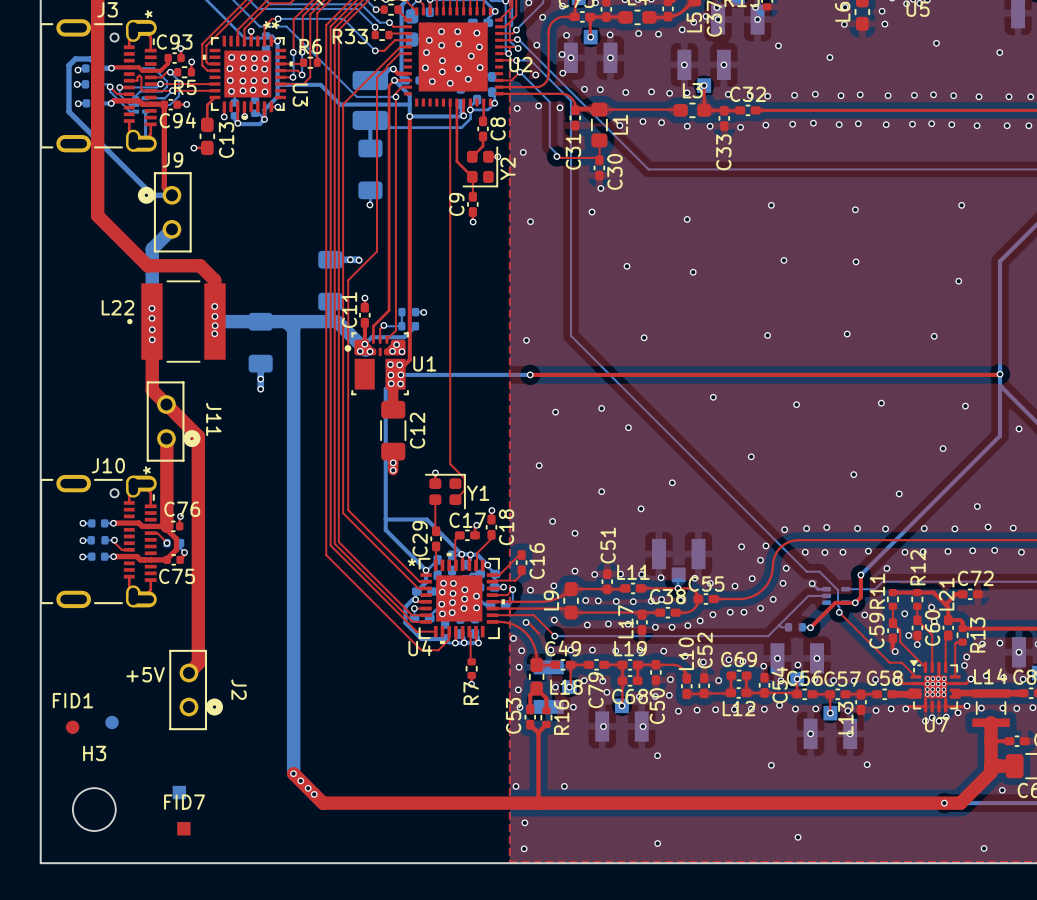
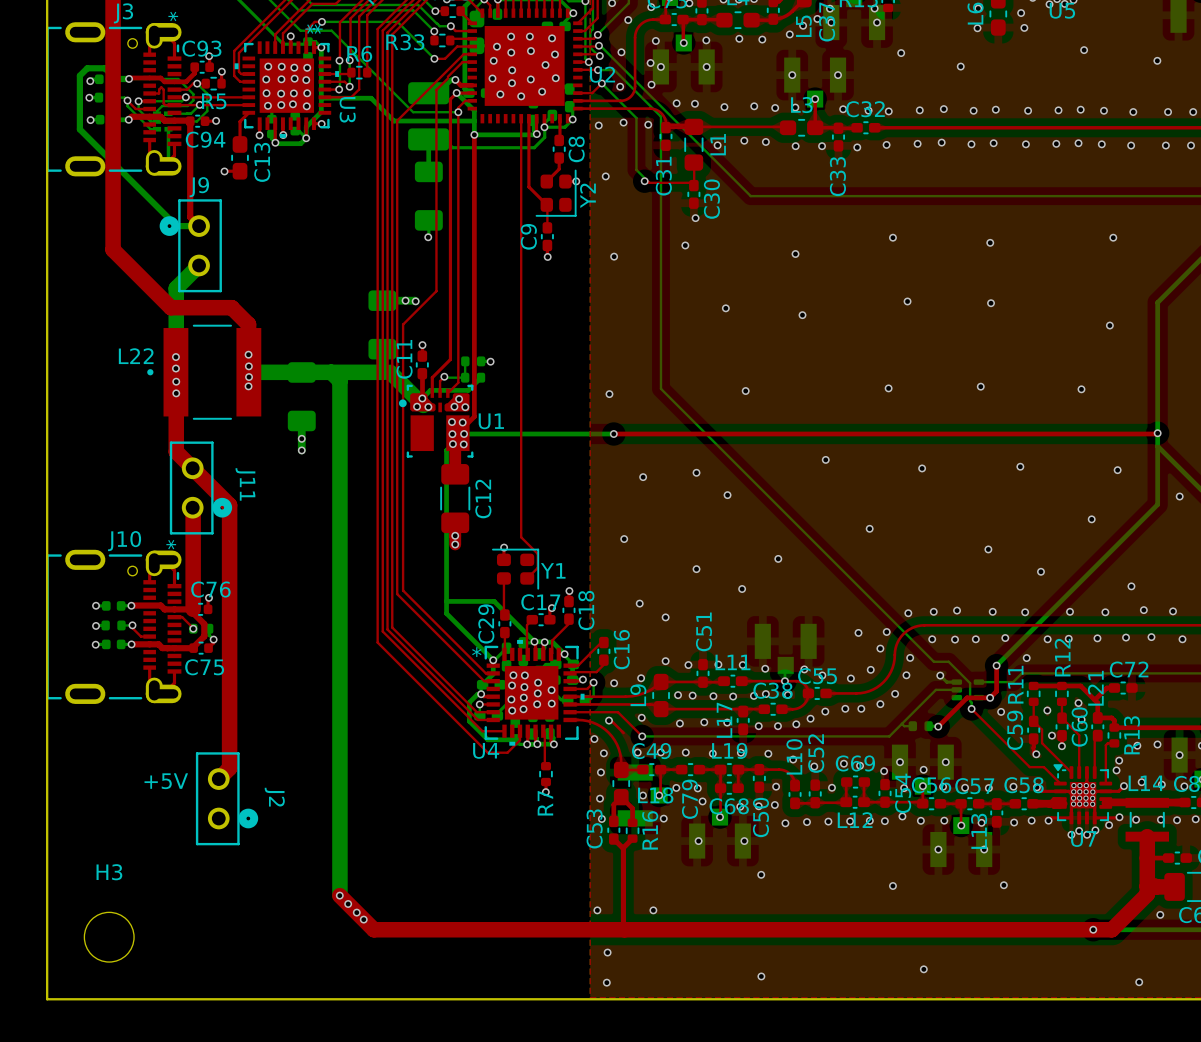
part: (112, 722) -> none
FID1: (72, 727) -> none
part: (179, 792) -> none
FID7: (183, 828) -> none

